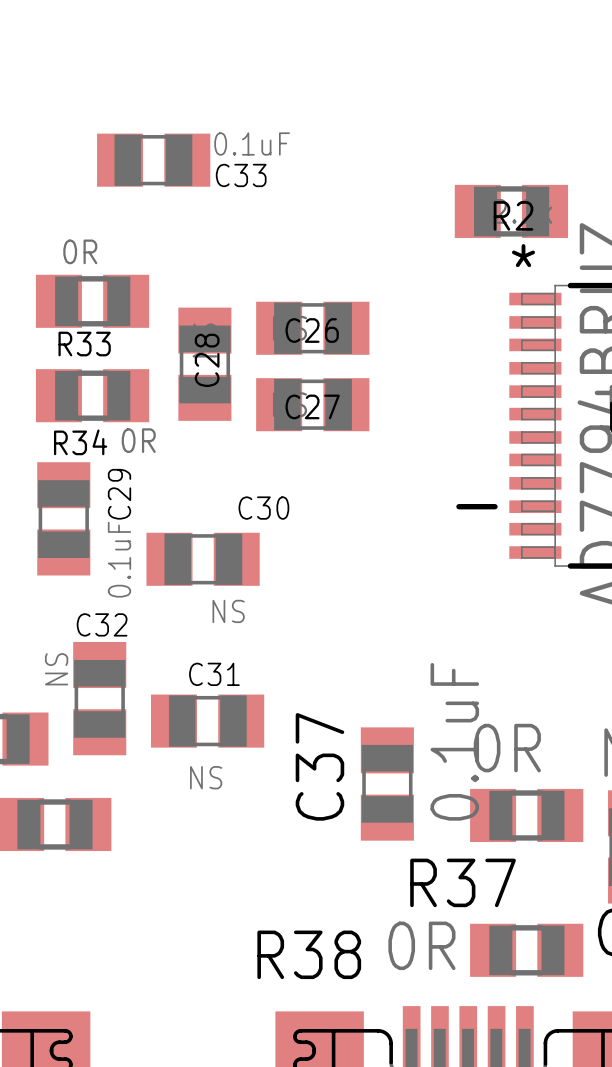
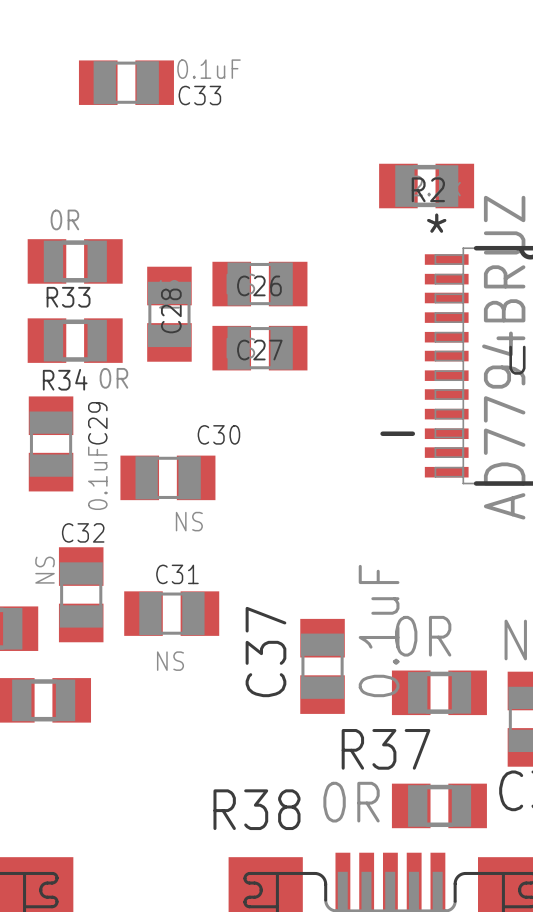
C33 position: (153, 160) -> (126, 82)

